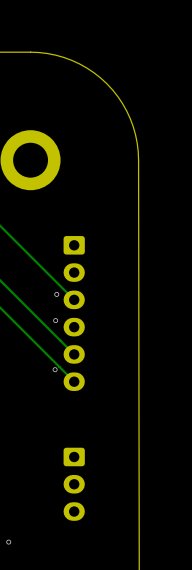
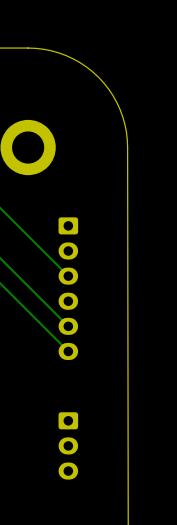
via: (56, 294) -> none
via: (55, 320) -> none
via: (55, 369) -> none
via: (8, 542) -> none

